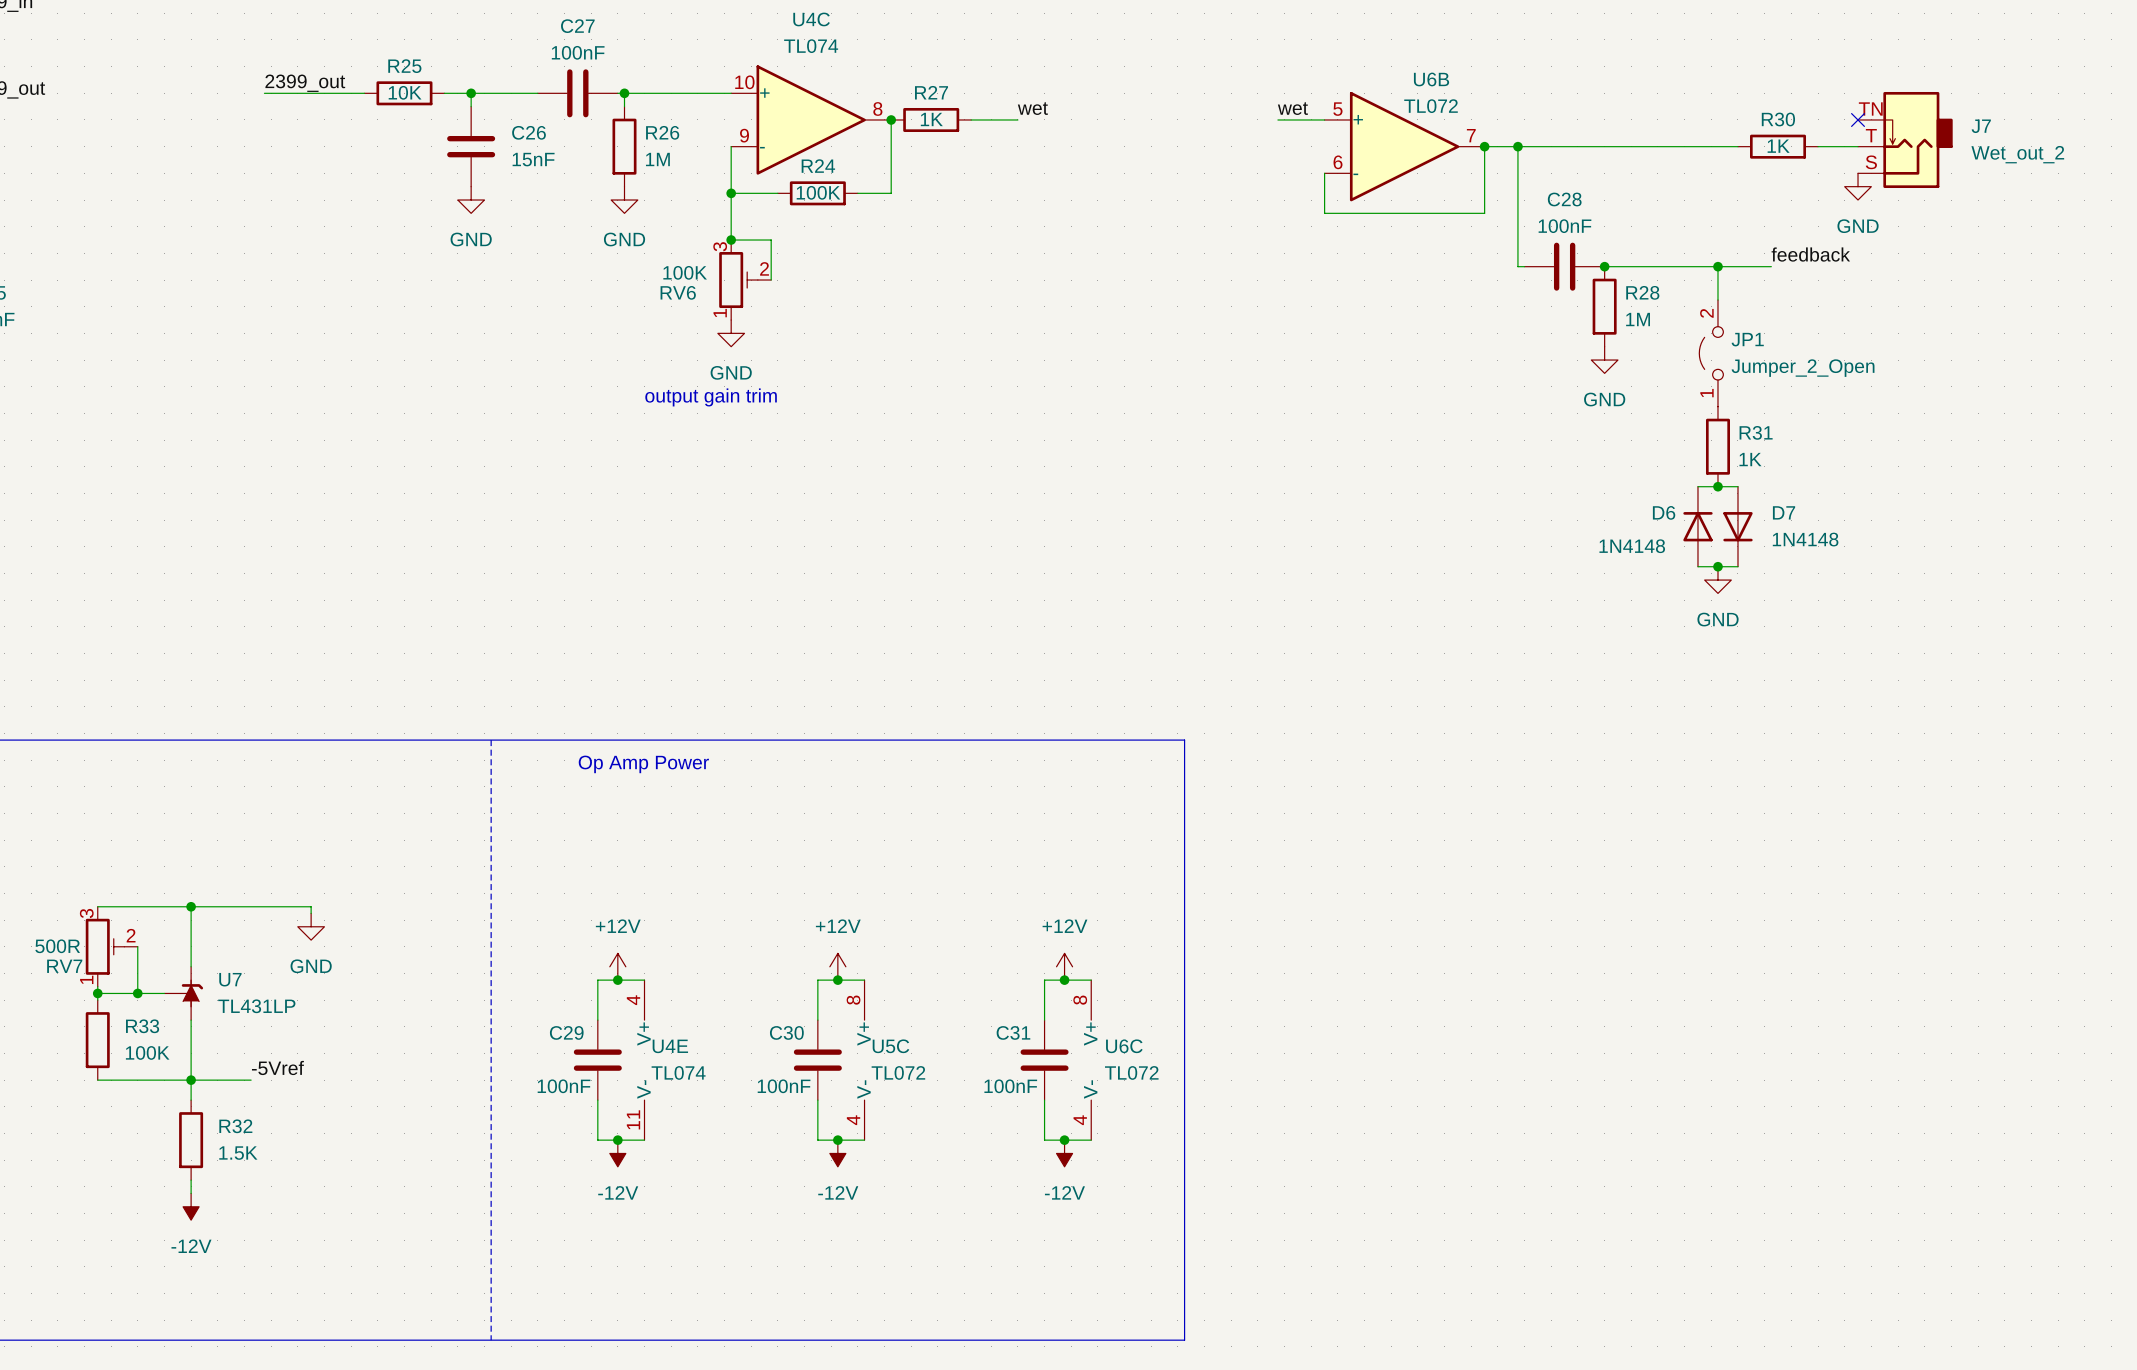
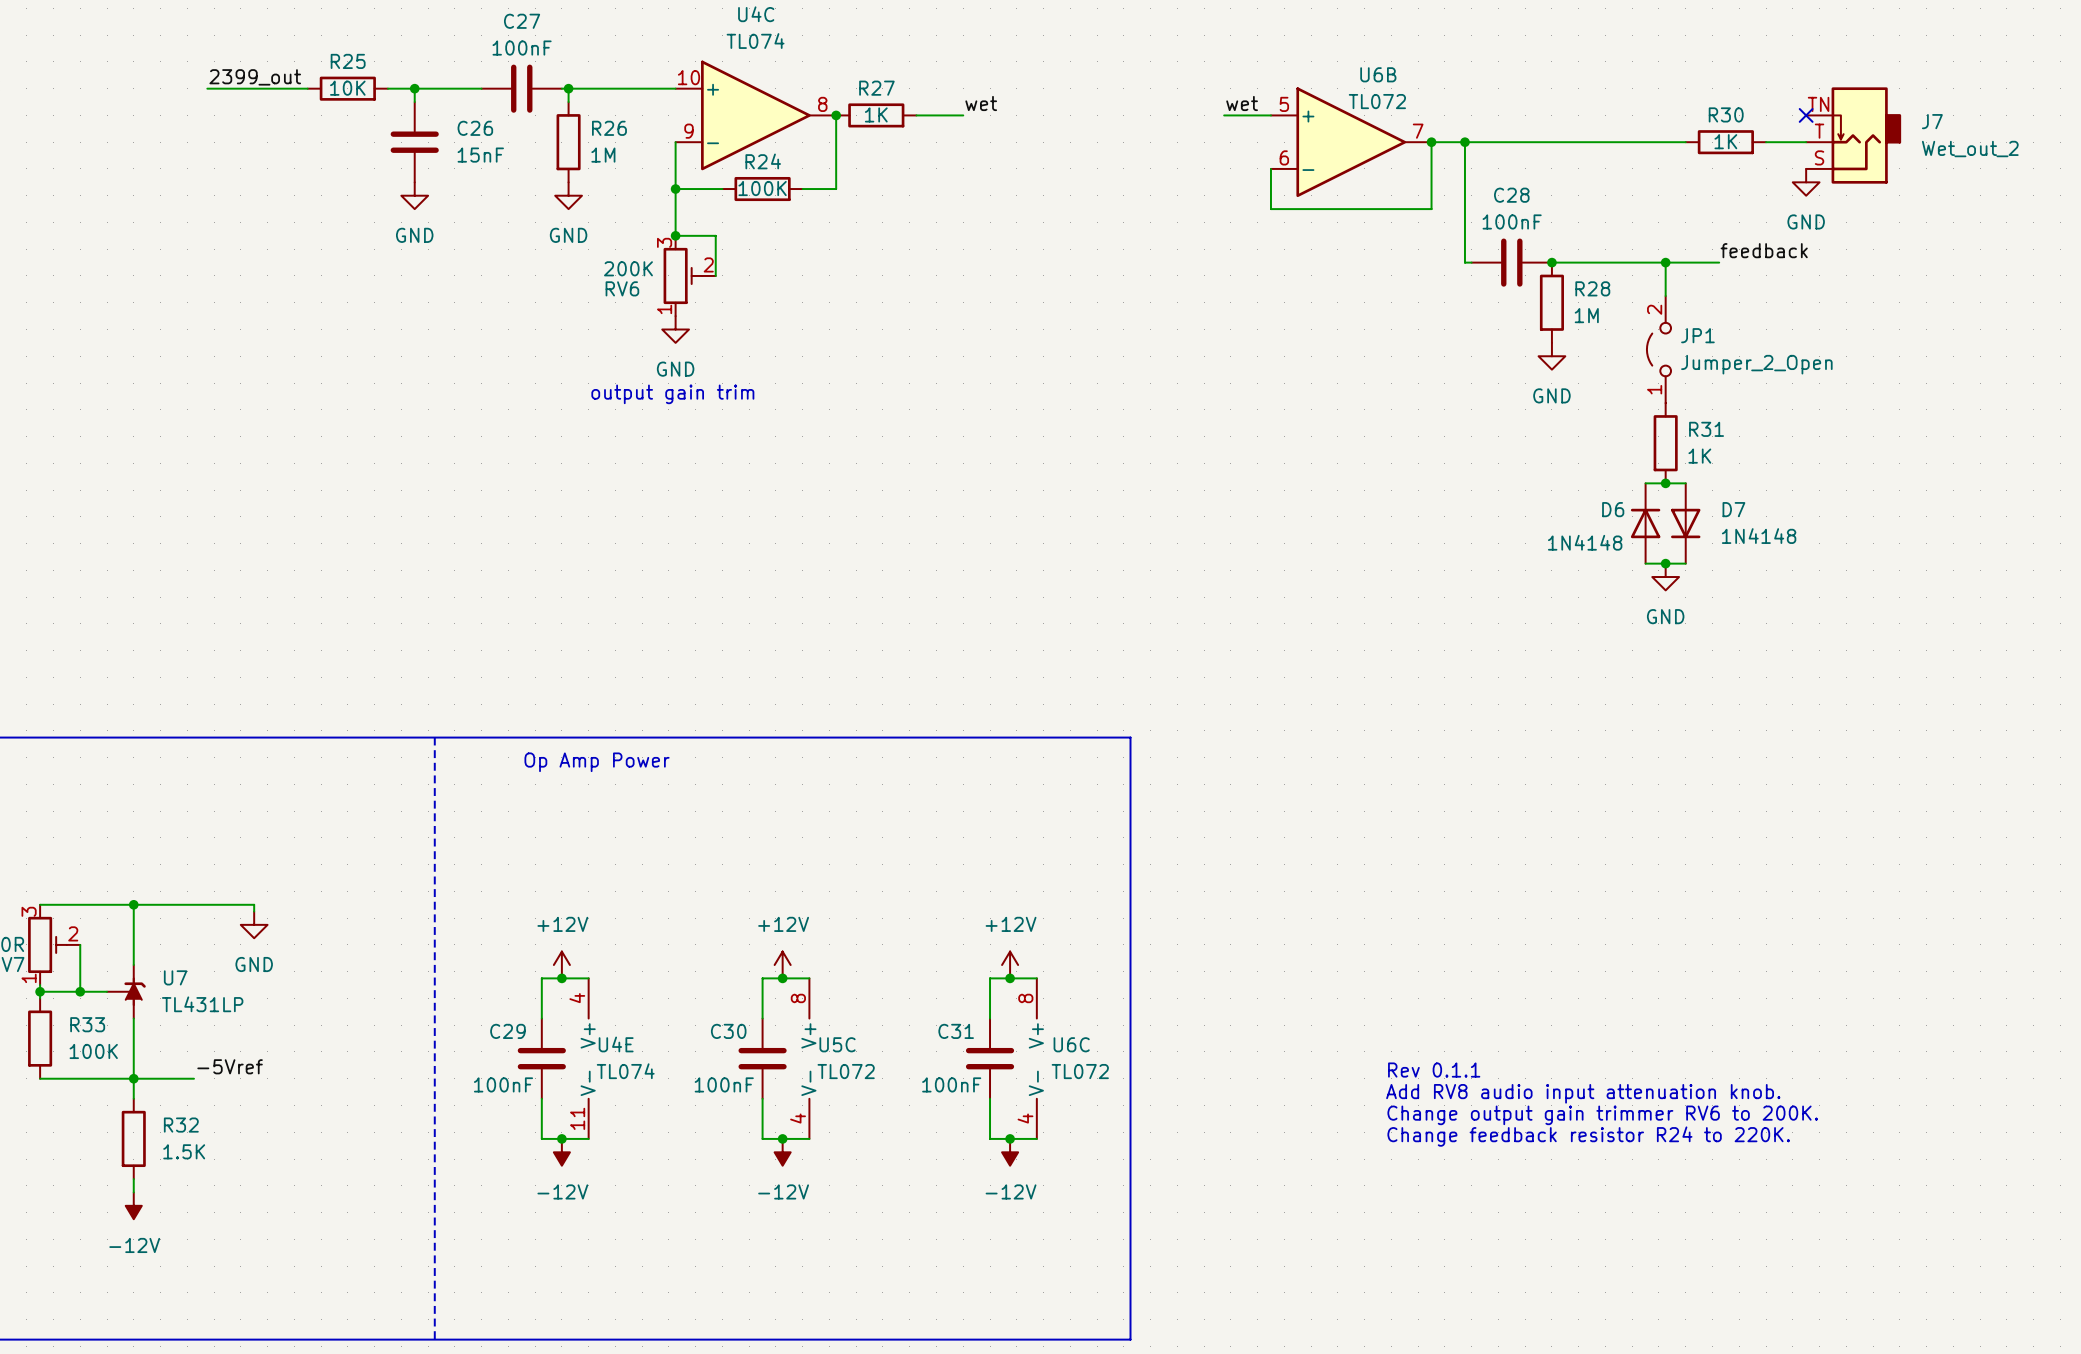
RV6 value: 100K (685, 272) -> 200K (628, 268)
text: none -> Rev 0.1.1 (1434, 1070)
text: none -> Add RV8 audio input attenuation knob. (1583, 1093)
text: none -> Change output gain trimmer RV6 to 200K. (1602, 1115)
text: none -> Change feedback resistor R24 to 220K. (1588, 1136)

